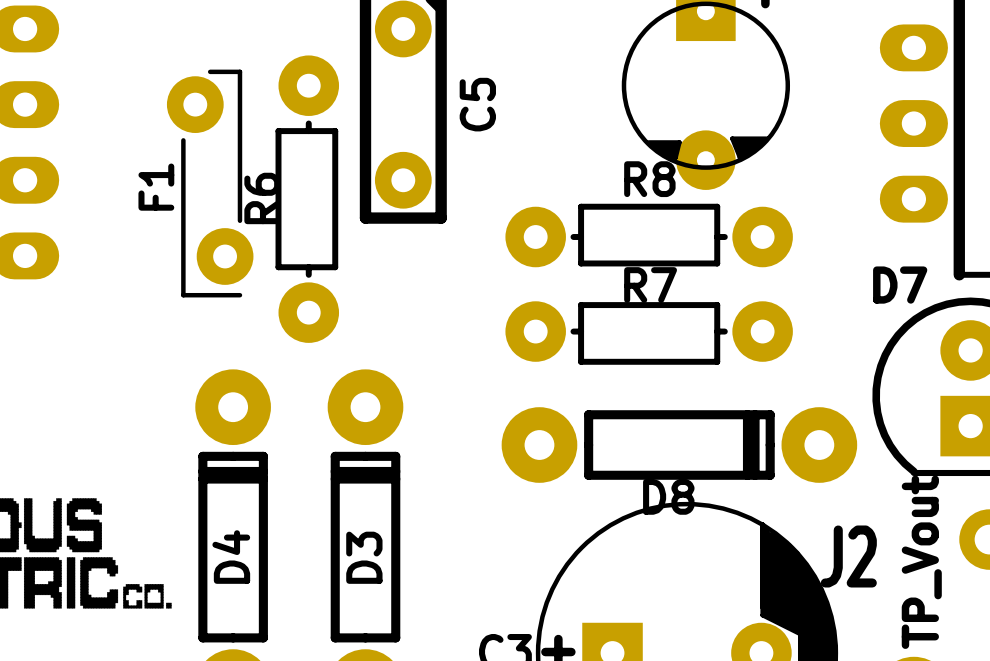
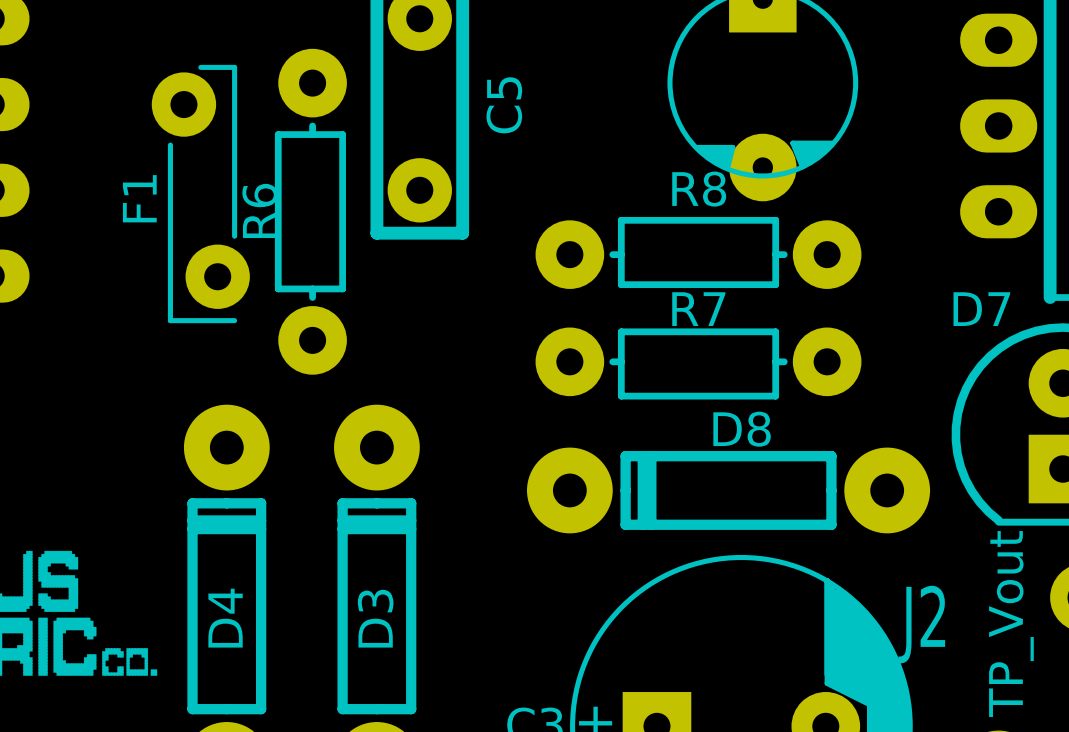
D8 rotation: 0° (679, 445) -> 180° (728, 490)

